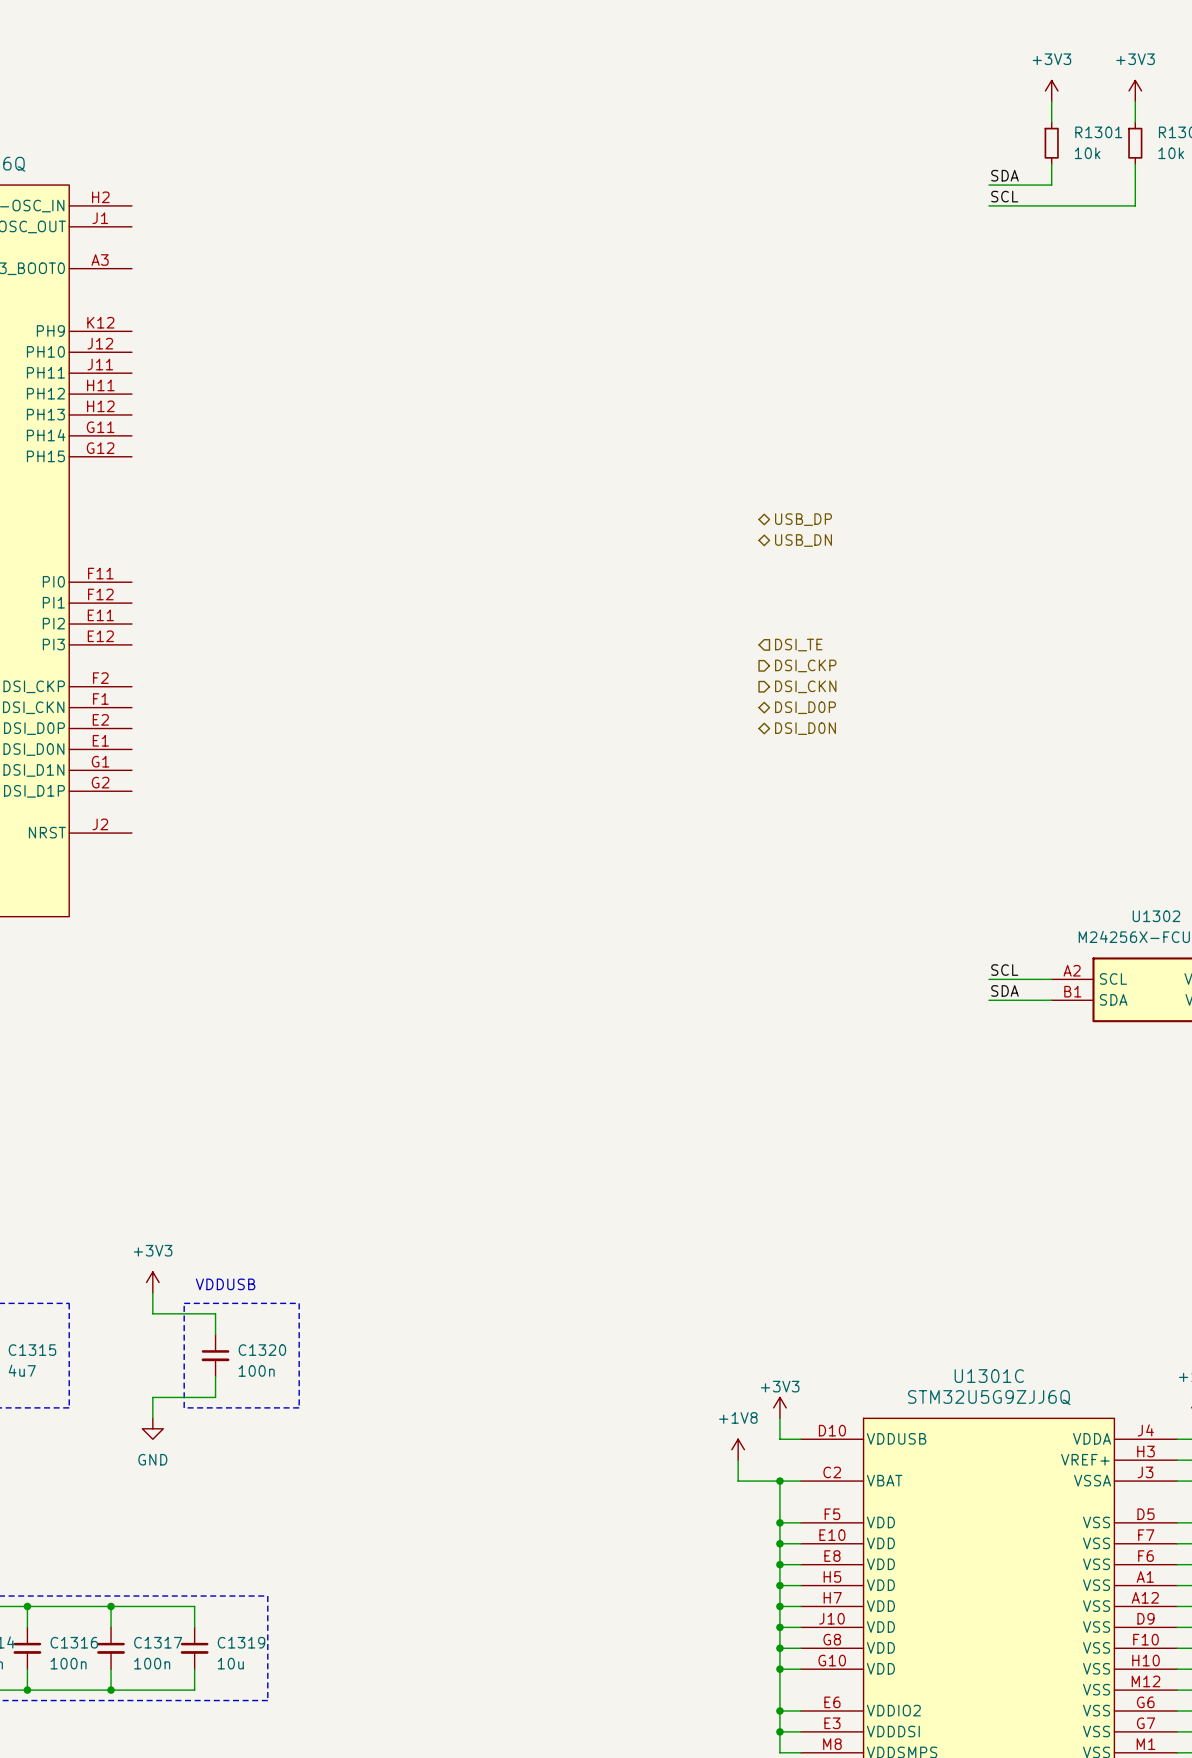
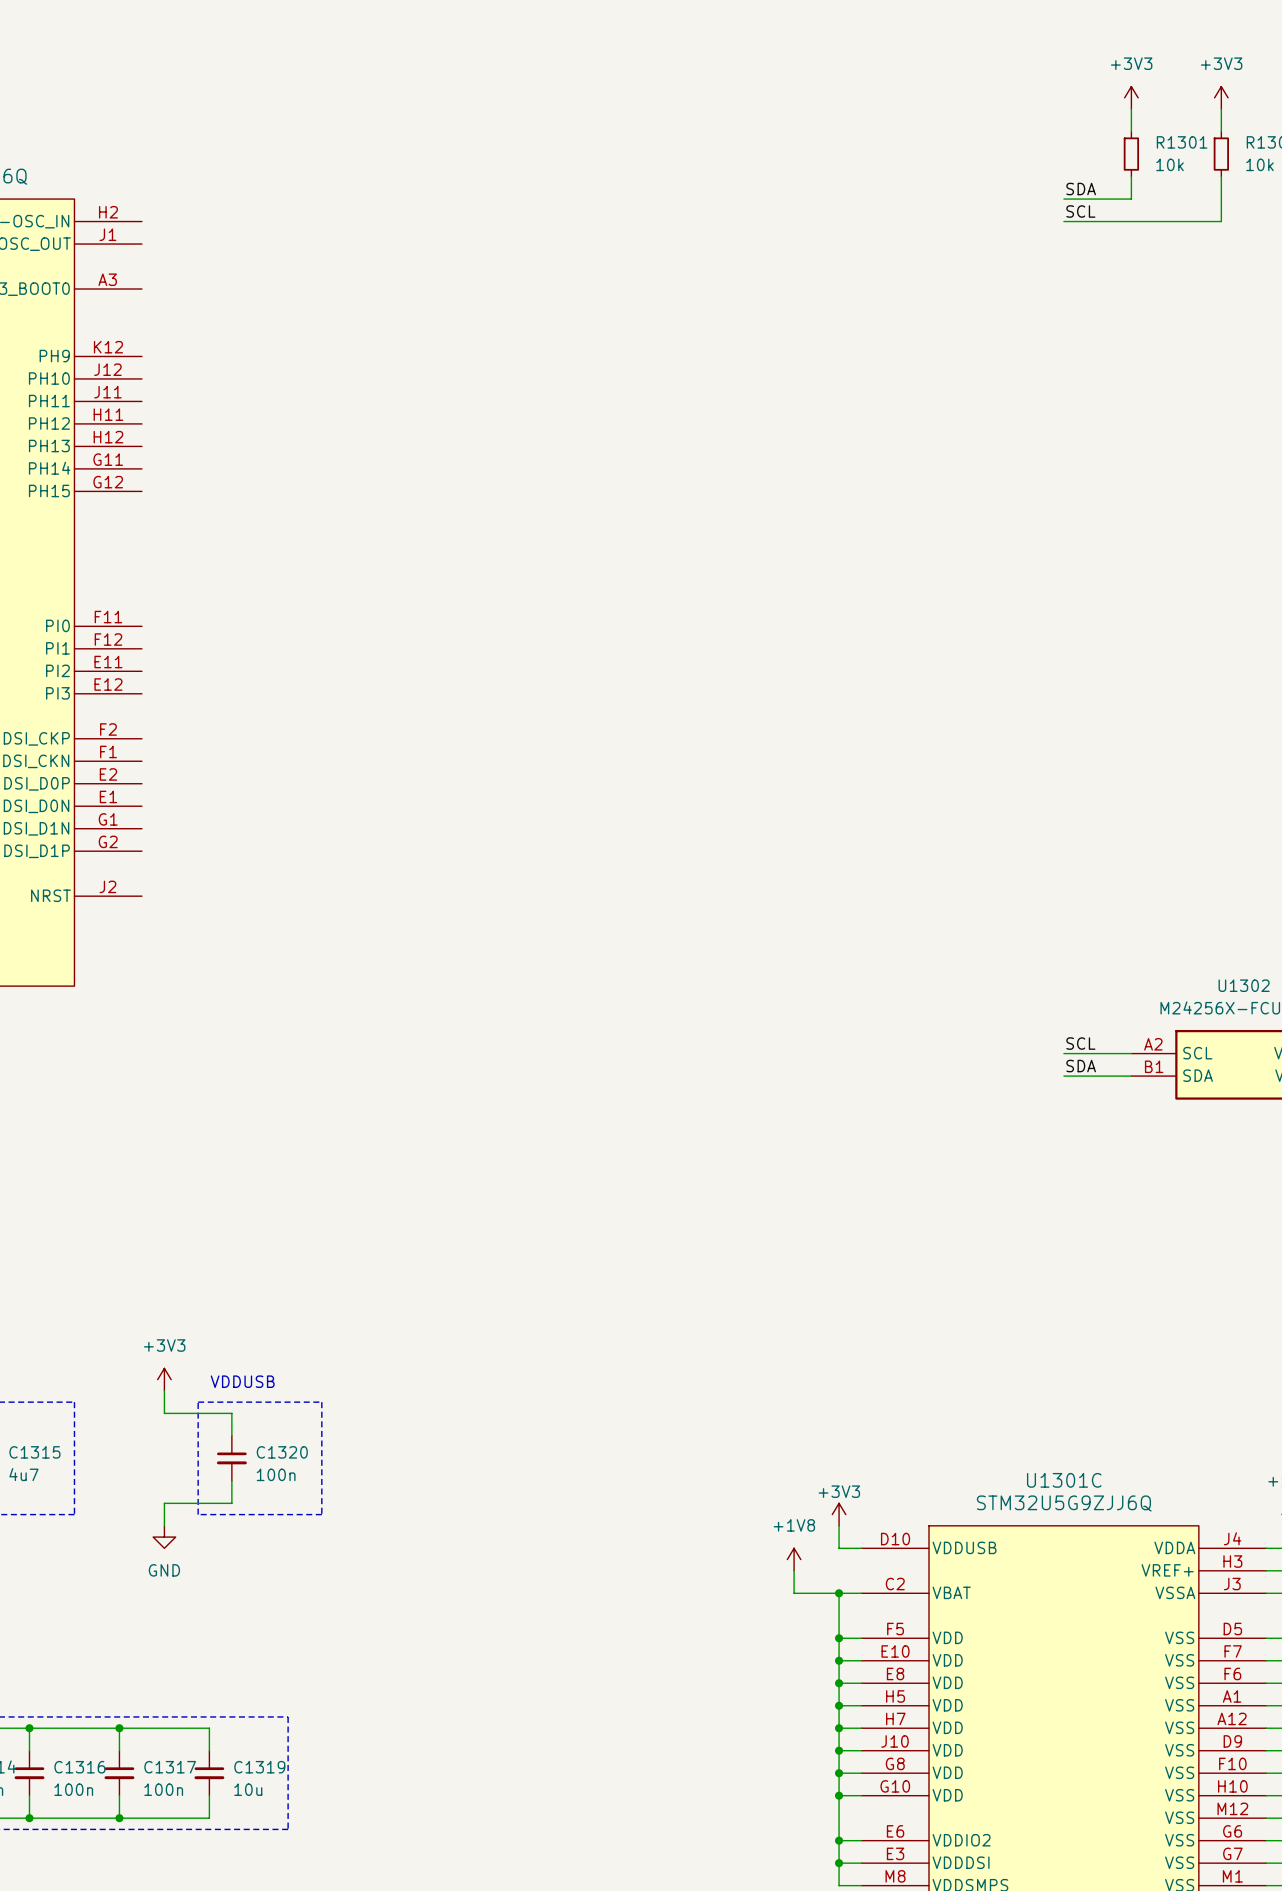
hierarchical label: USB_DP (803, 519) -> none
hierarchical label: USB_DN (803, 540) -> none
hierarchical label: DSI_TE (798, 645) -> none
hierarchical label: DSI_CKP (805, 665) -> none
hierarchical label: DSI_CKN (805, 686) -> none
hierarchical label: DSI_D0P (805, 707) -> none
hierarchical label: DSI_D0N (805, 728) -> none

